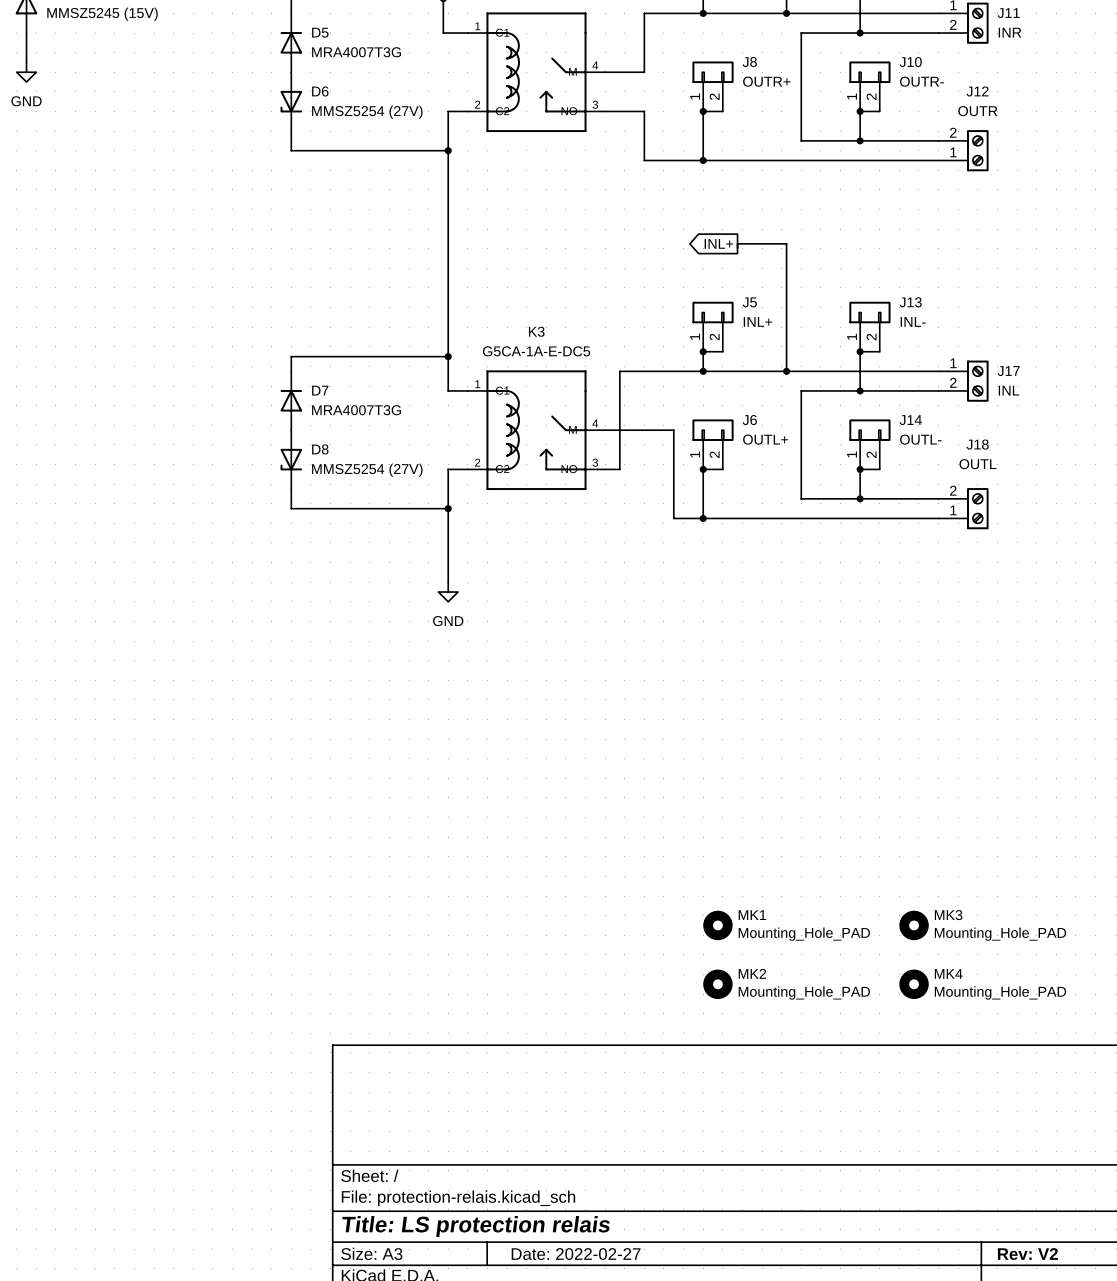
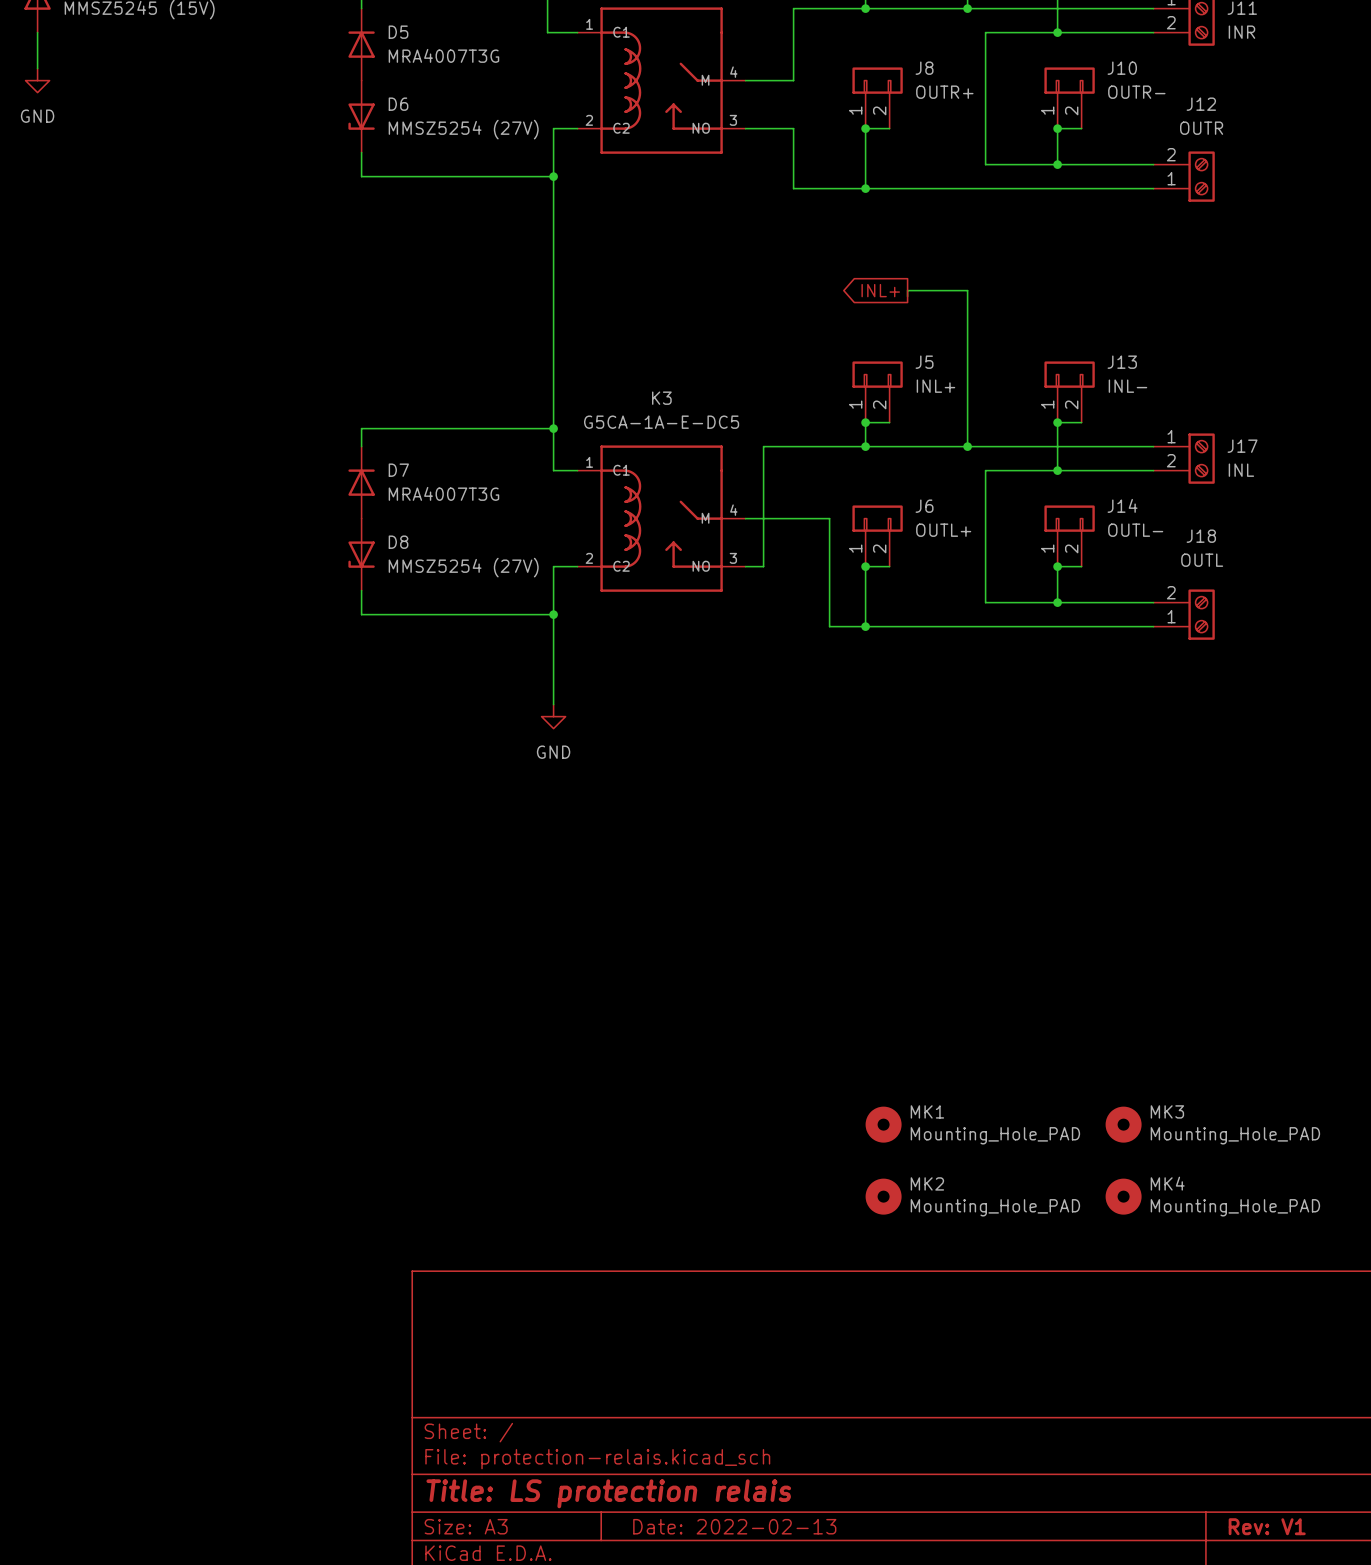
title block: Date: 2022-02-27 (576, 1254) -> Date: 2022-02-13 (734, 1526)
title block: Rev: V2 (1027, 1254) -> Rev: V1 (1267, 1526)

